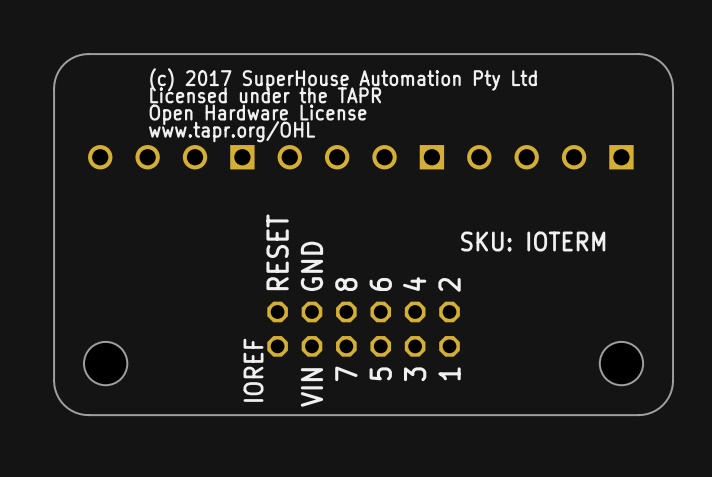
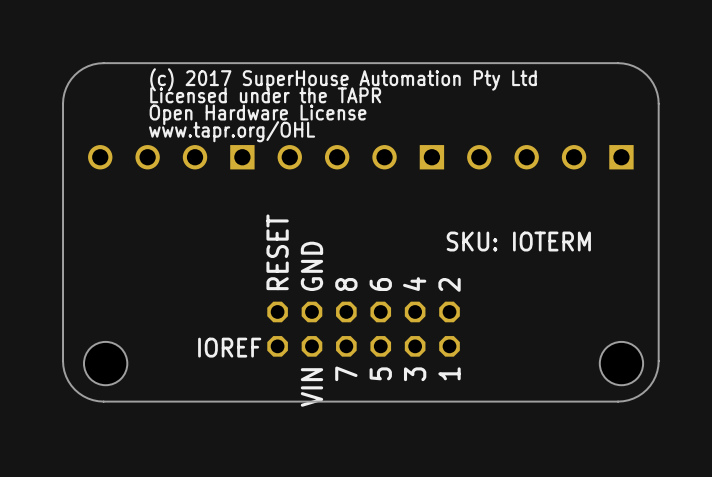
board edge: (638, 54) (88, 54) (71, 58) (58, 71) (54, 88) (54, 380) (58, 397) (71, 410) (88, 415) (638, 415) (655, 410) (668, 397) (673, 380) (673, 88) (670, 75) (662, 64) (651, 56) (638, 54) -> (618, 63) (633, 66) (646, 75) (655, 88) (658, 103) (658, 366) (650, 385) (638, 396) (618, 401) (103, 401) (83, 396) (68, 381) (63, 360) (63, 103) (68, 83) (83, 68) (103, 63) (618, 63)
text position: SKU: IOTERM (533, 241) -> SKU: IOTERM (518, 241)
text rotation: 0° (253, 370) -> 90° clockwise (229, 347)

